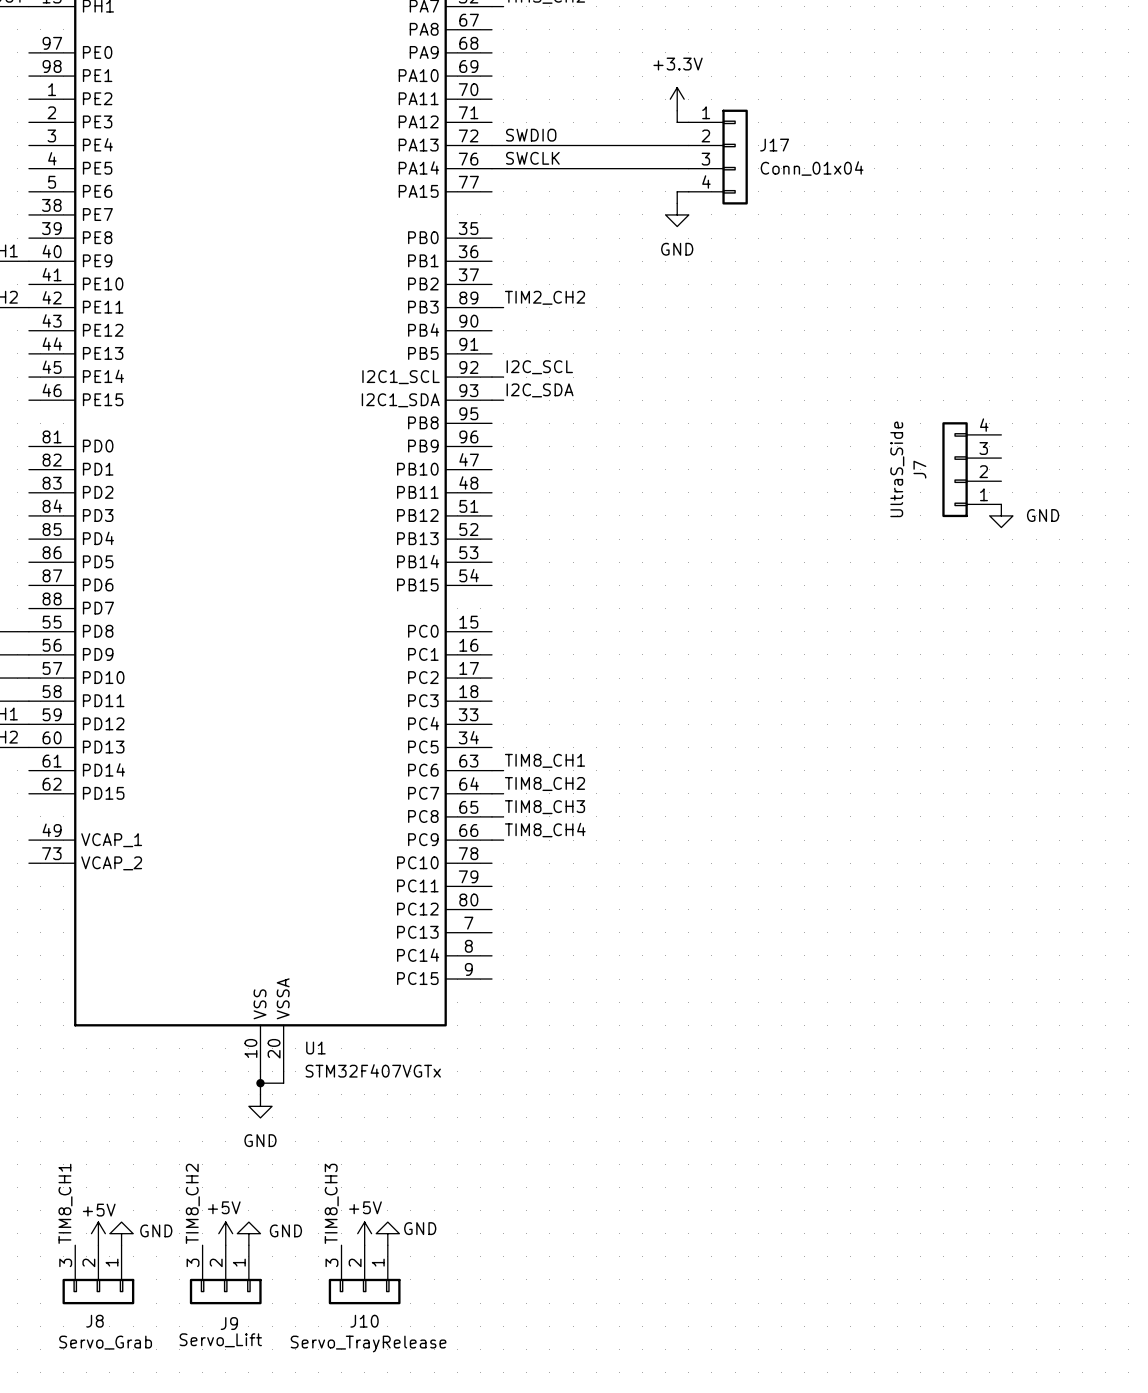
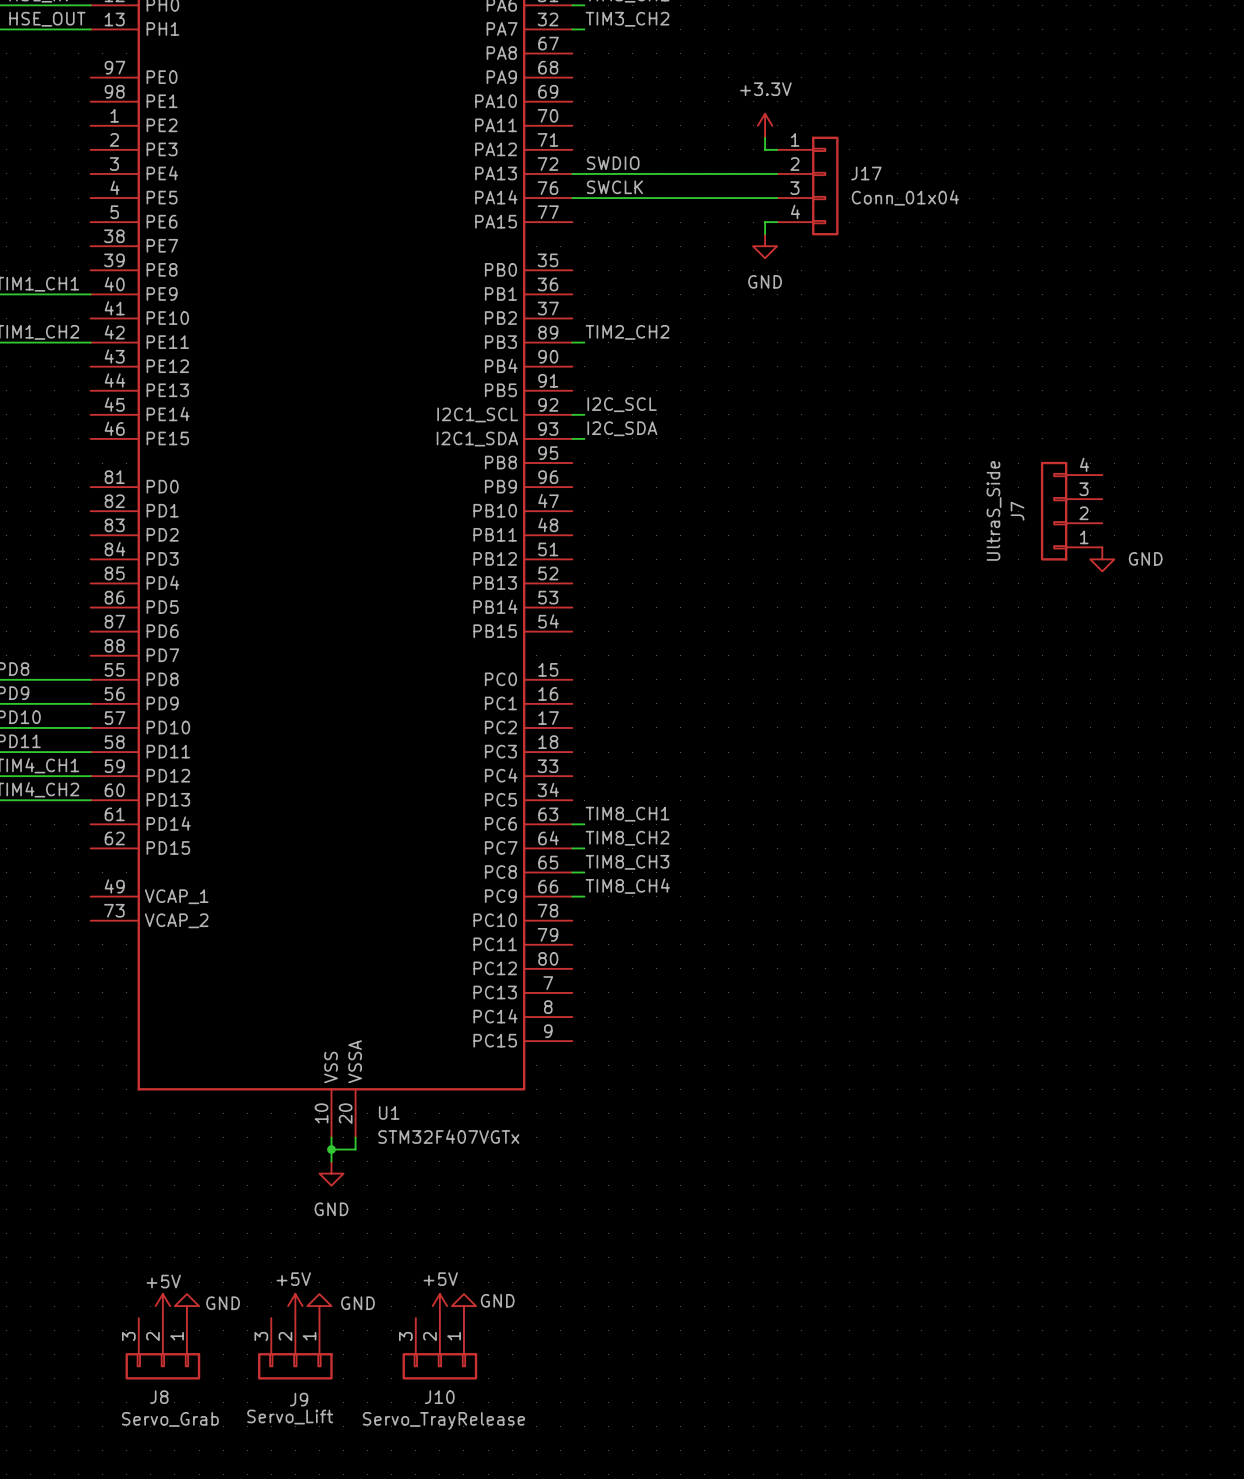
label: TIM8_CH1 (65, 1203) -> none
label: TIM8_CH2 (192, 1203) -> none
label: TIM8_CH3 (331, 1203) -> none

